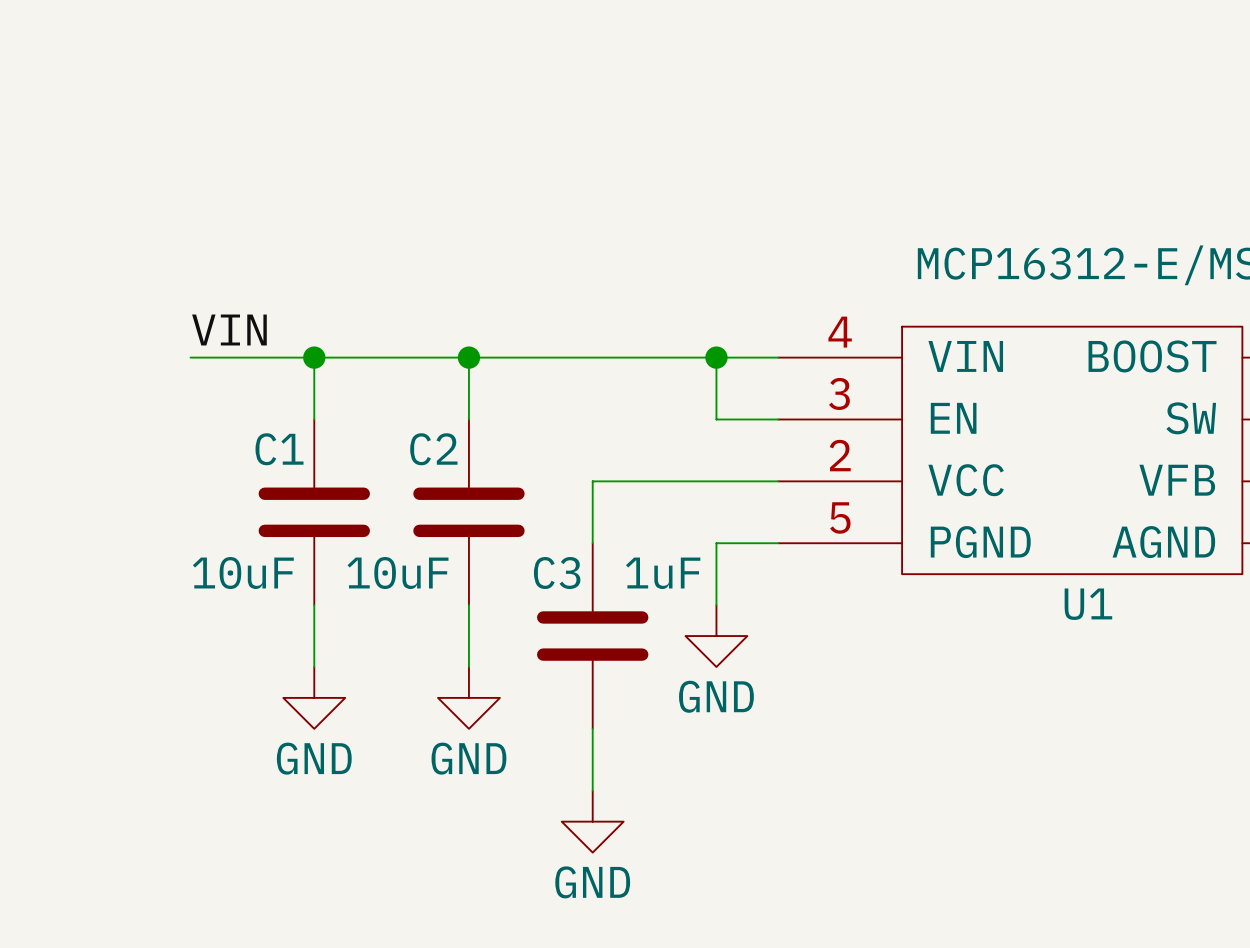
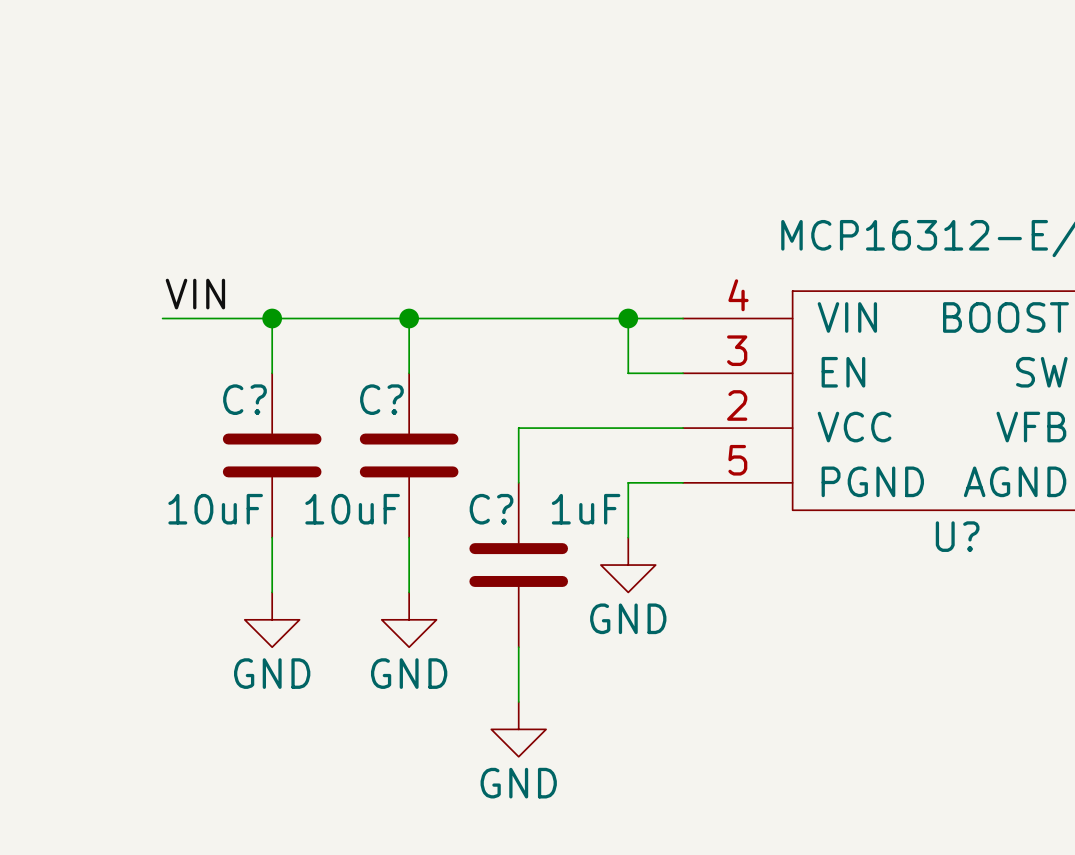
C1 name: C1 (279, 449) -> C? (244, 399)
C2 name: C2 (433, 449) -> C? (381, 399)
C3 name: C3 (557, 573) -> C? (491, 509)
U1 name: U1 (1088, 604) -> U? (957, 536)

